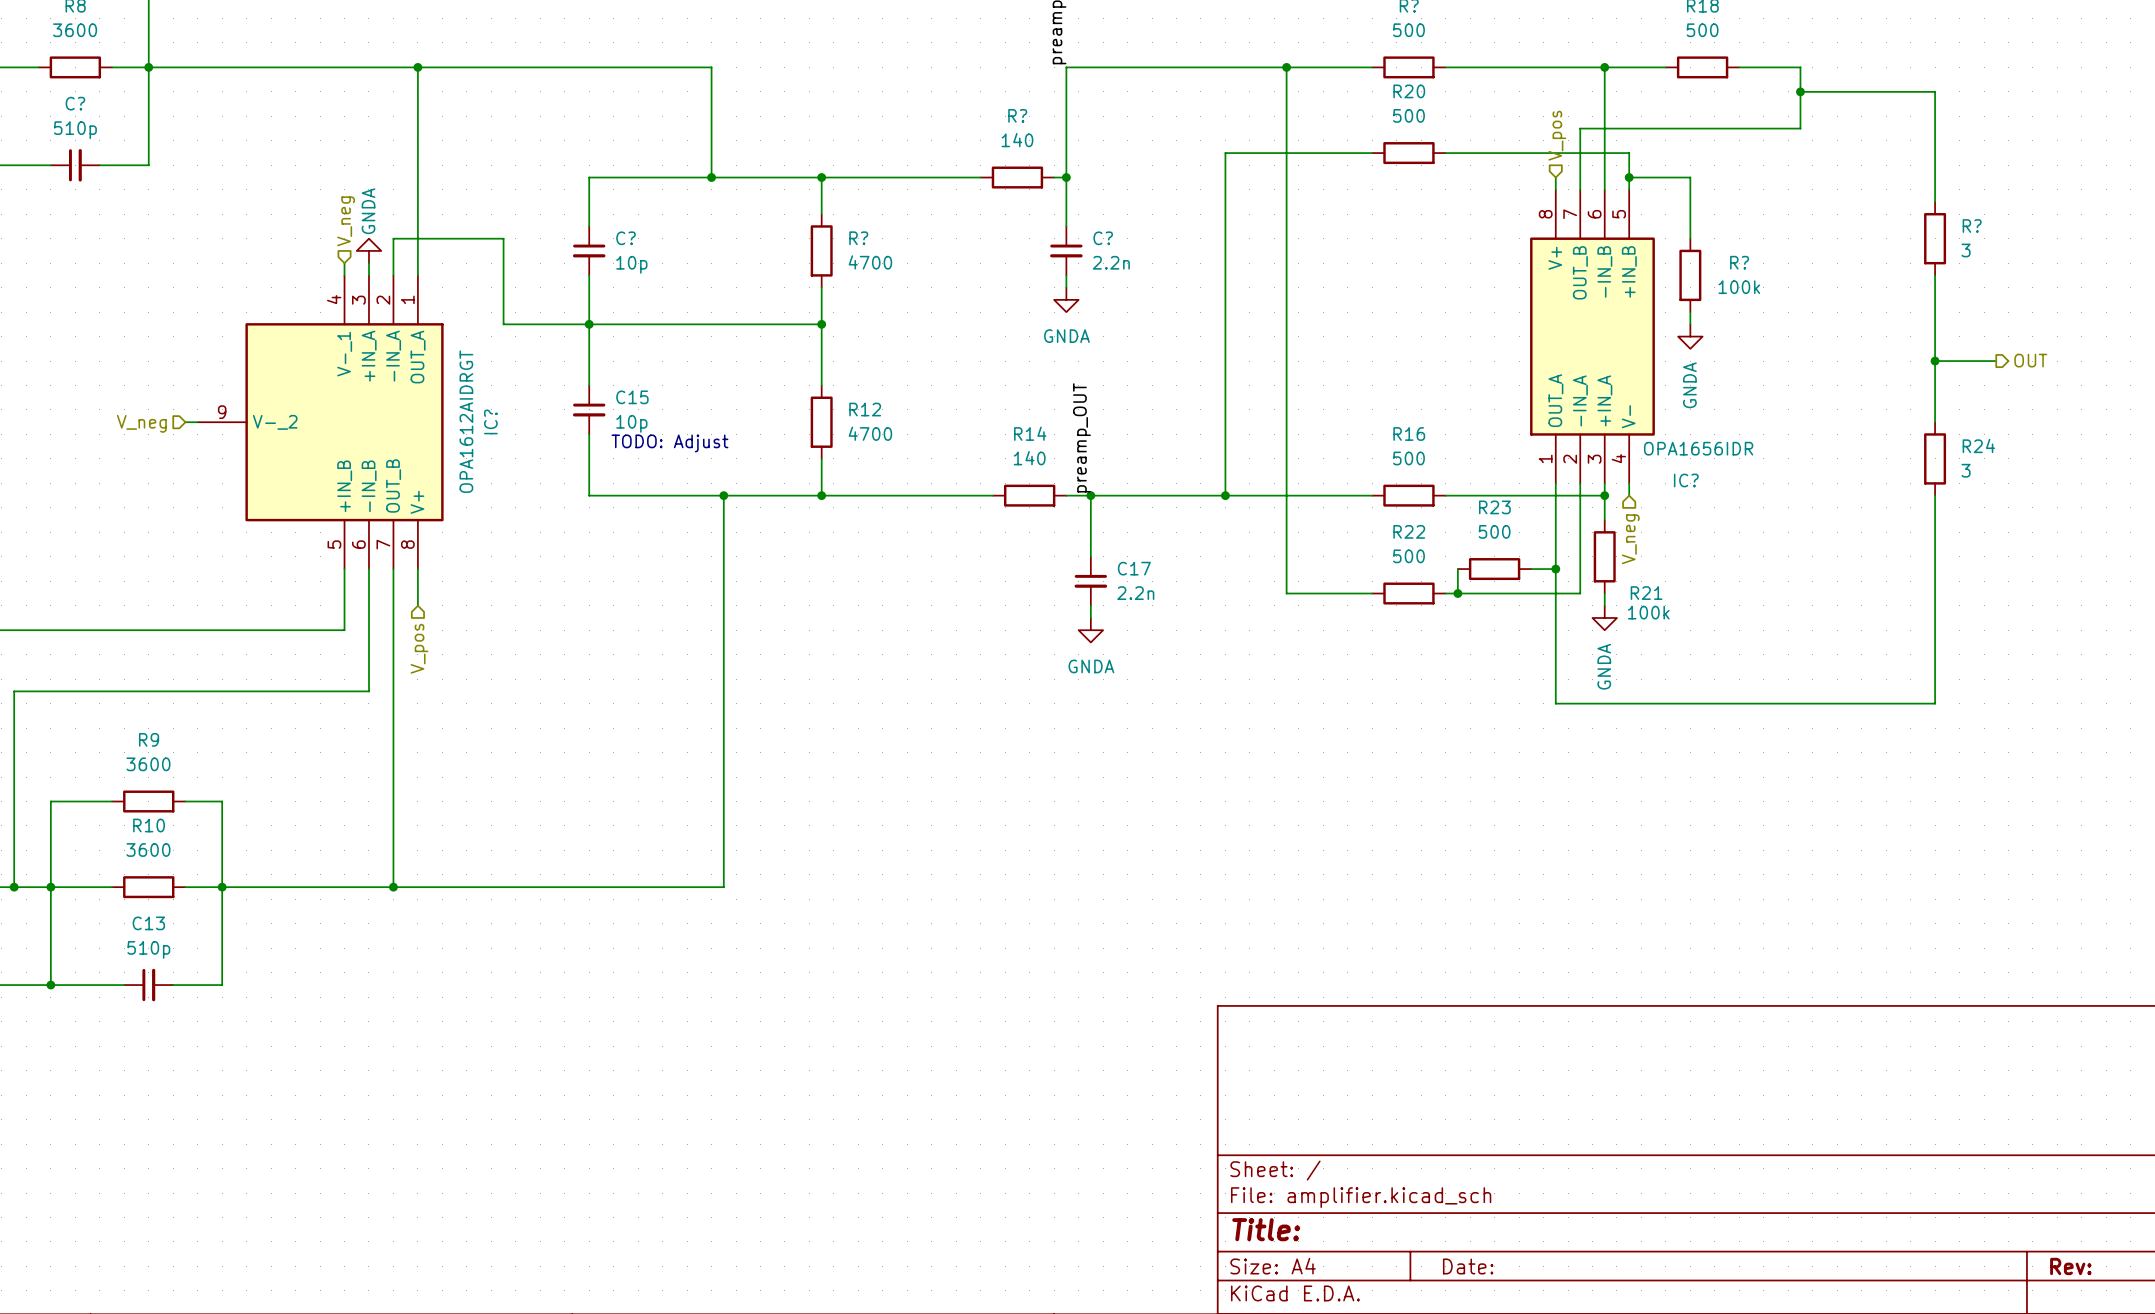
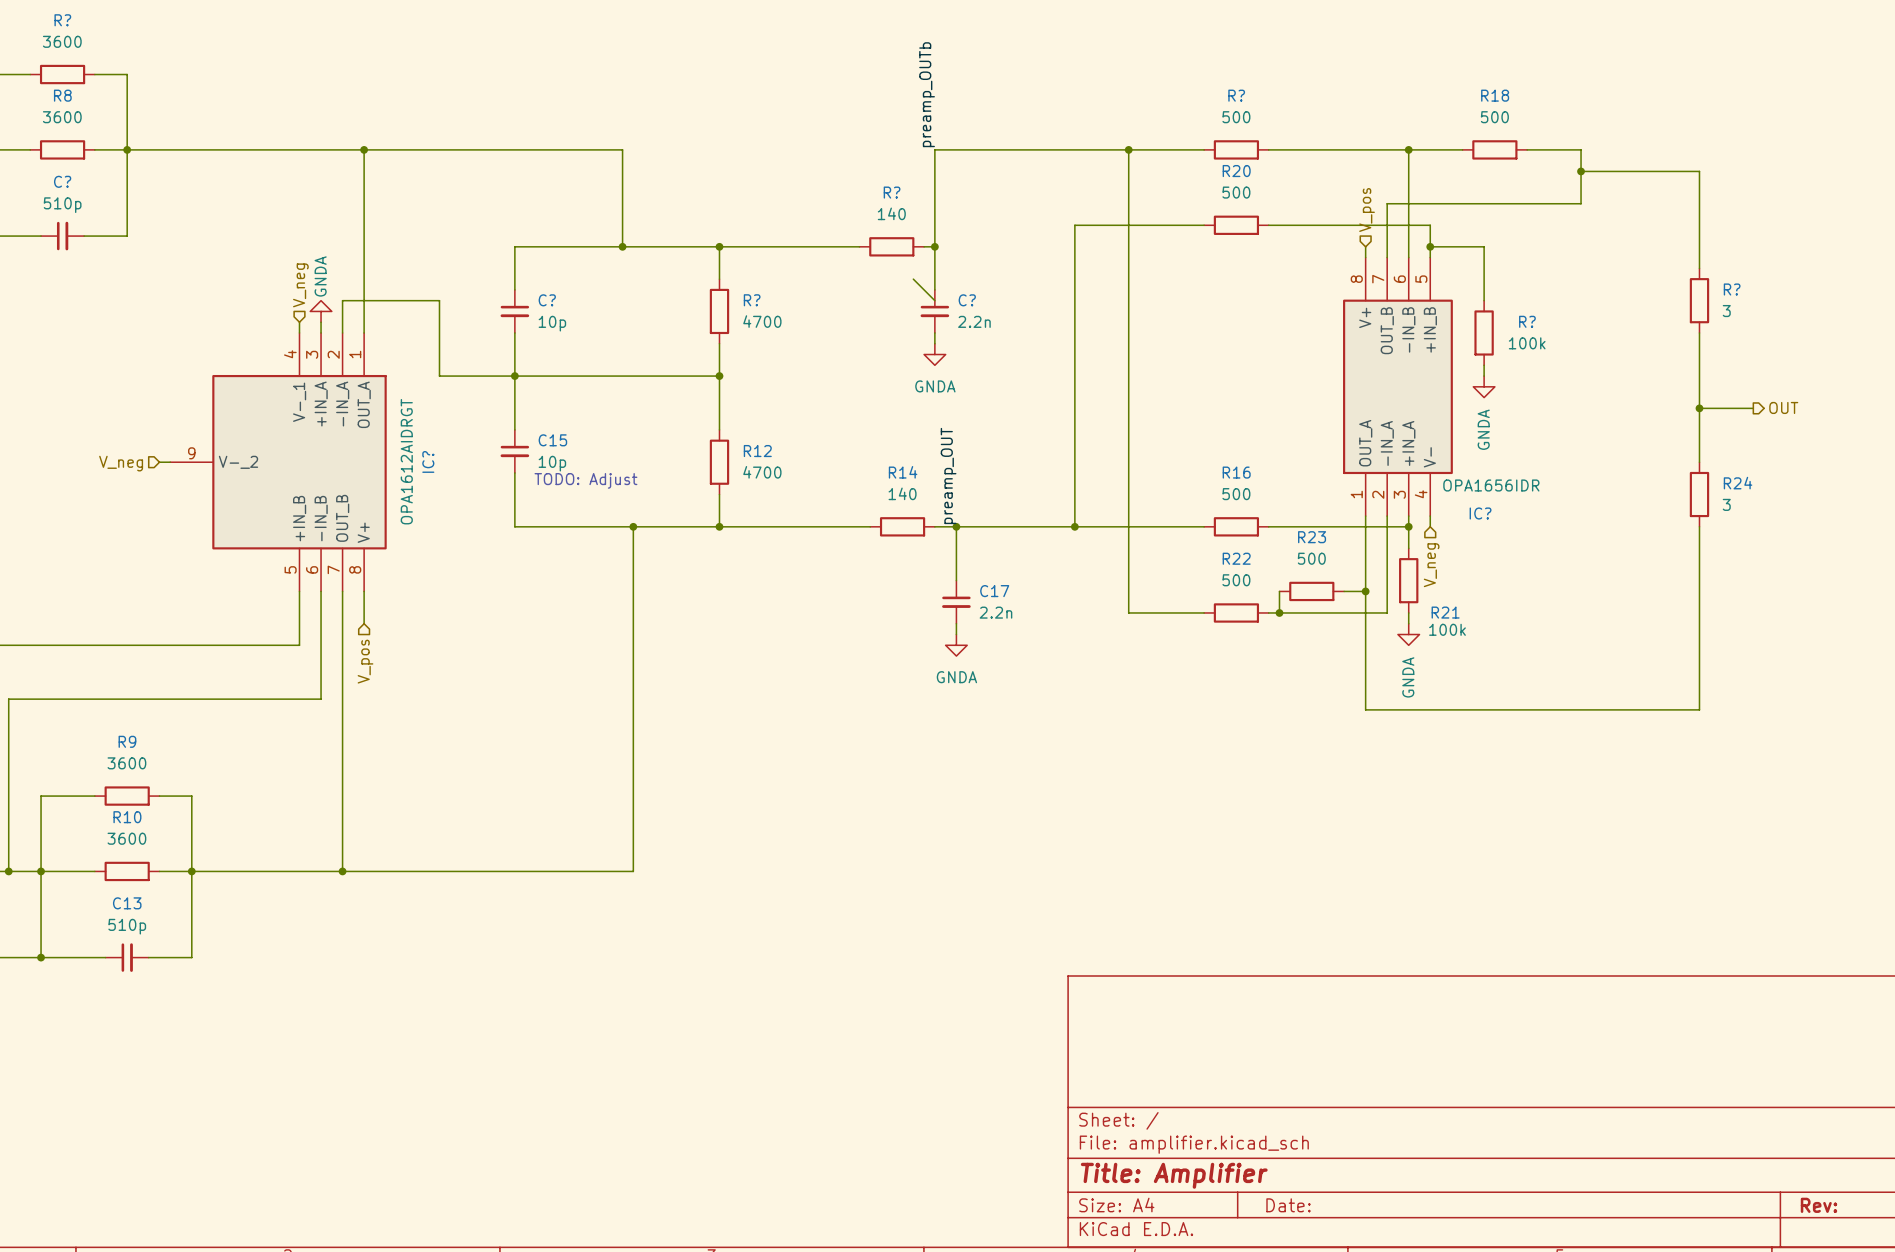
wire: none -> (913, 279) (934, 300)
title block: Title: (1266, 1229) -> Title: Amplifier (1174, 1175)

